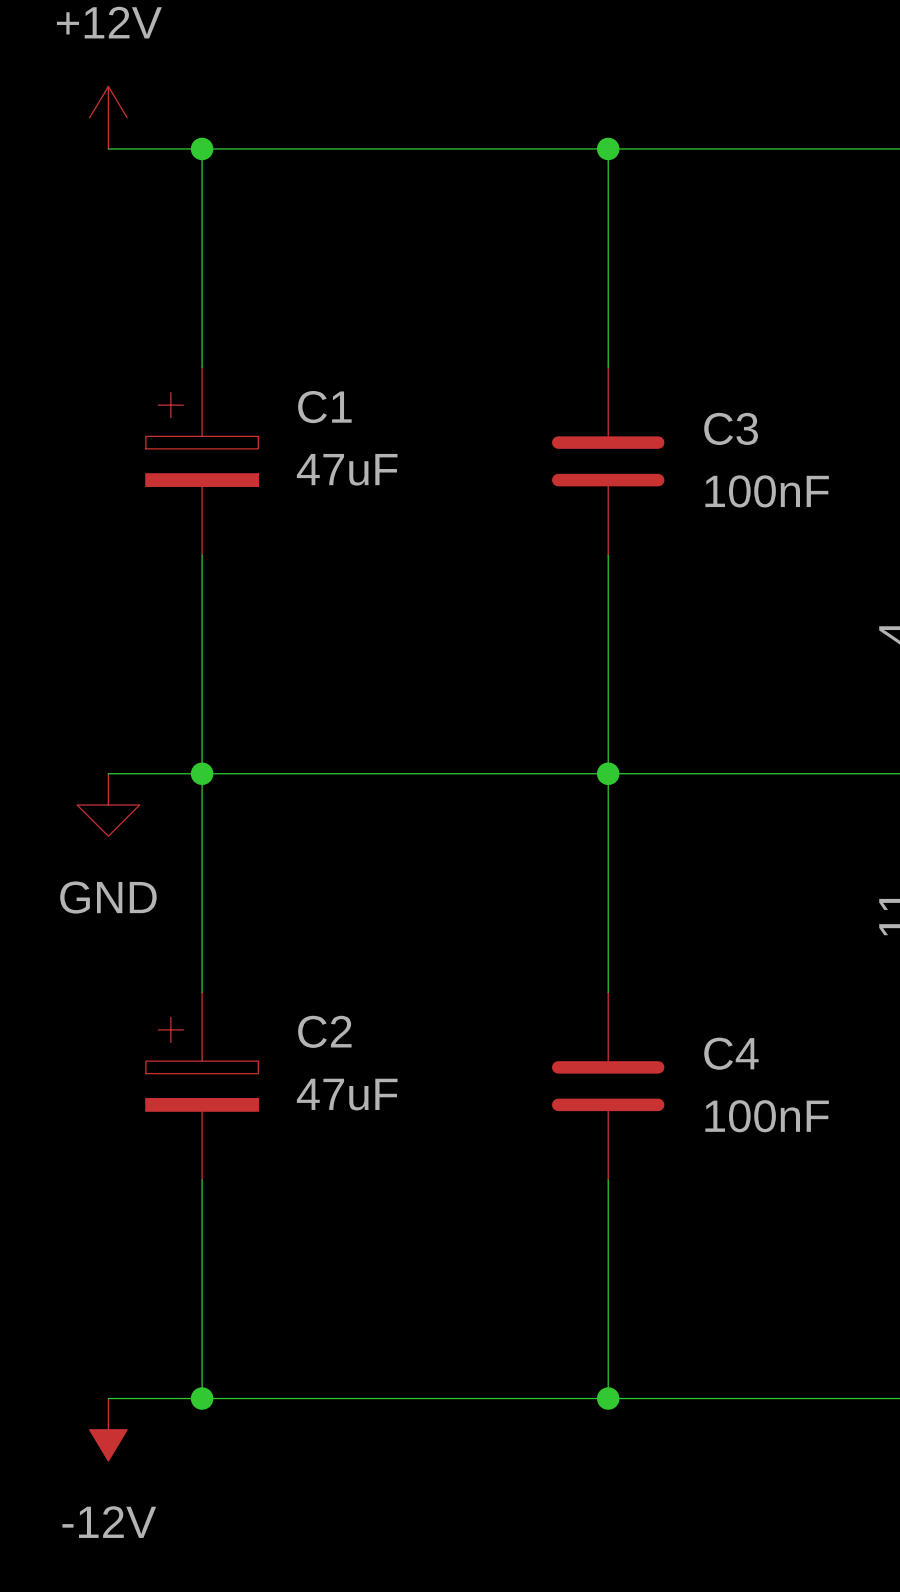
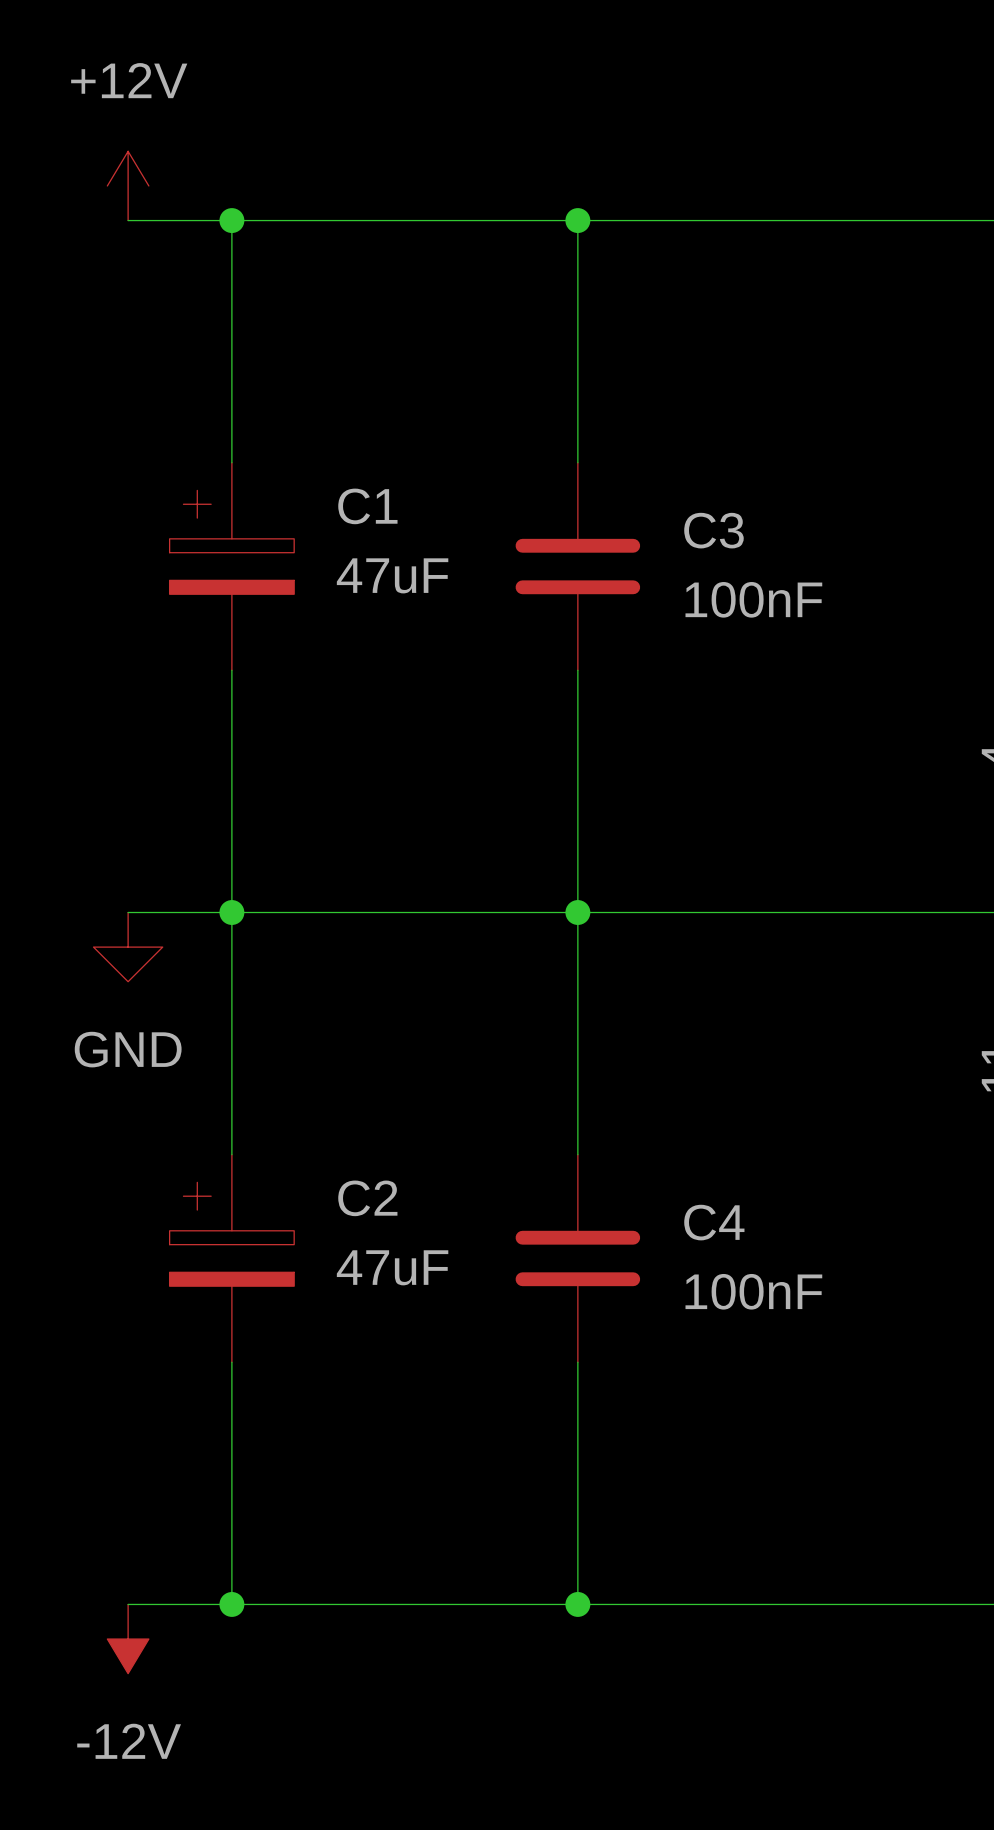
wire: (608, 148) (608, 367) -> (577, 220) (577, 462)
junction position: (608, 148) -> (577, 220)
C3 position: (608, 461) -> (577, 566)
wire: (608, 555) (608, 992) -> (577, 670) (577, 1154)
junction position: (608, 773) -> (577, 912)
C4 position: (608, 1086) -> (577, 1258)
wire: (608, 1179) (608, 1398) -> (577, 1362) (577, 1604)
junction position: (608, 1398) -> (577, 1604)

